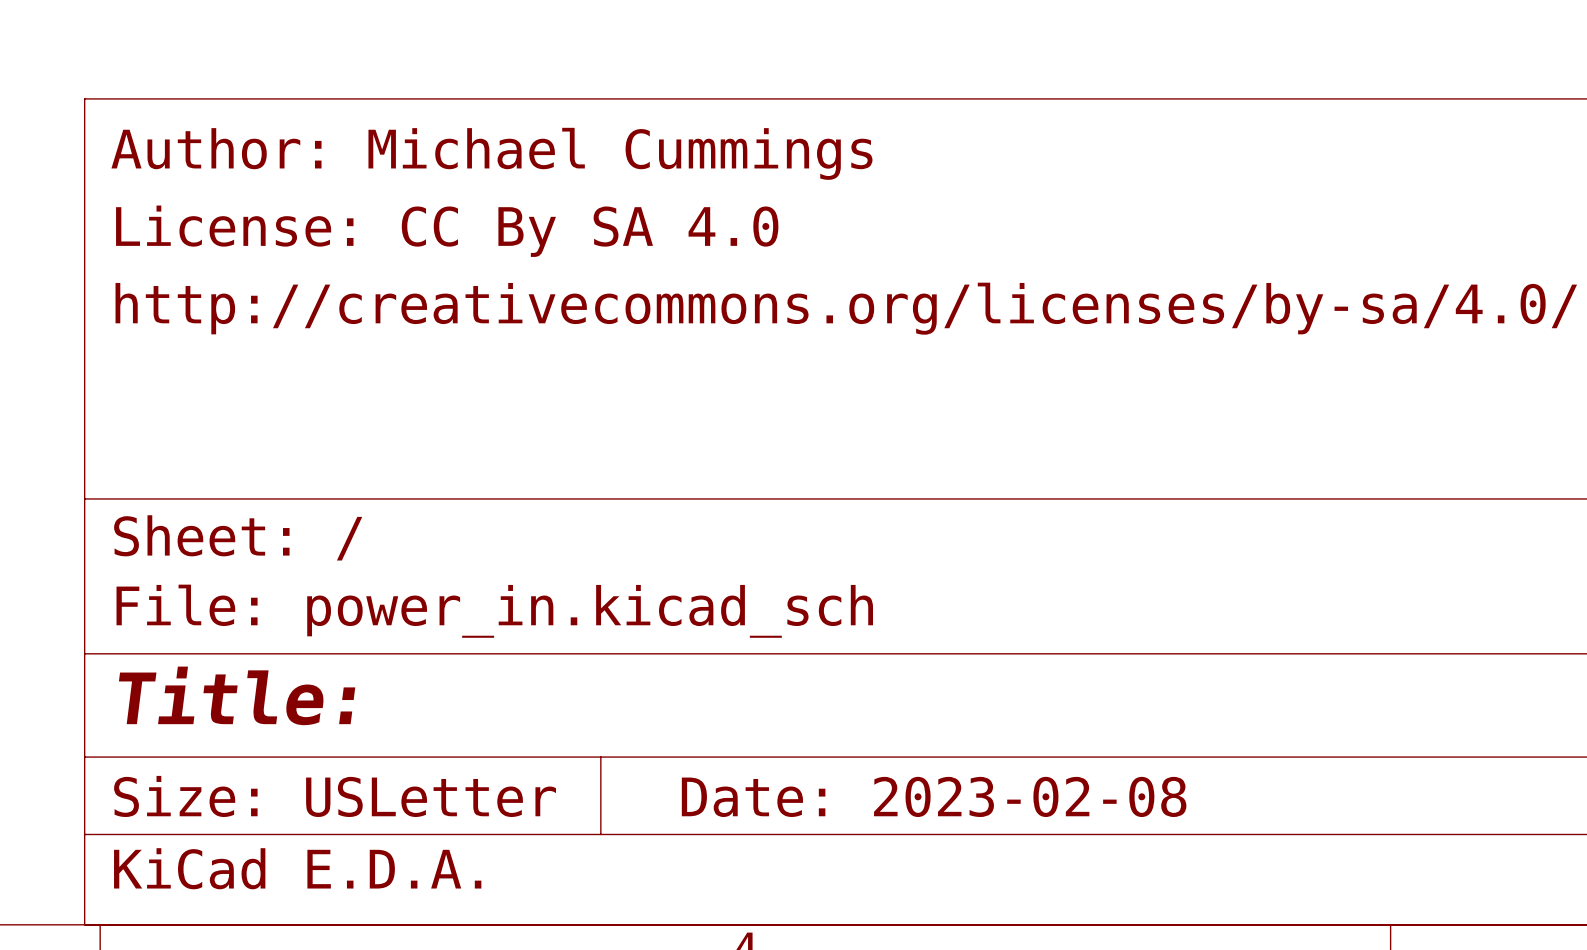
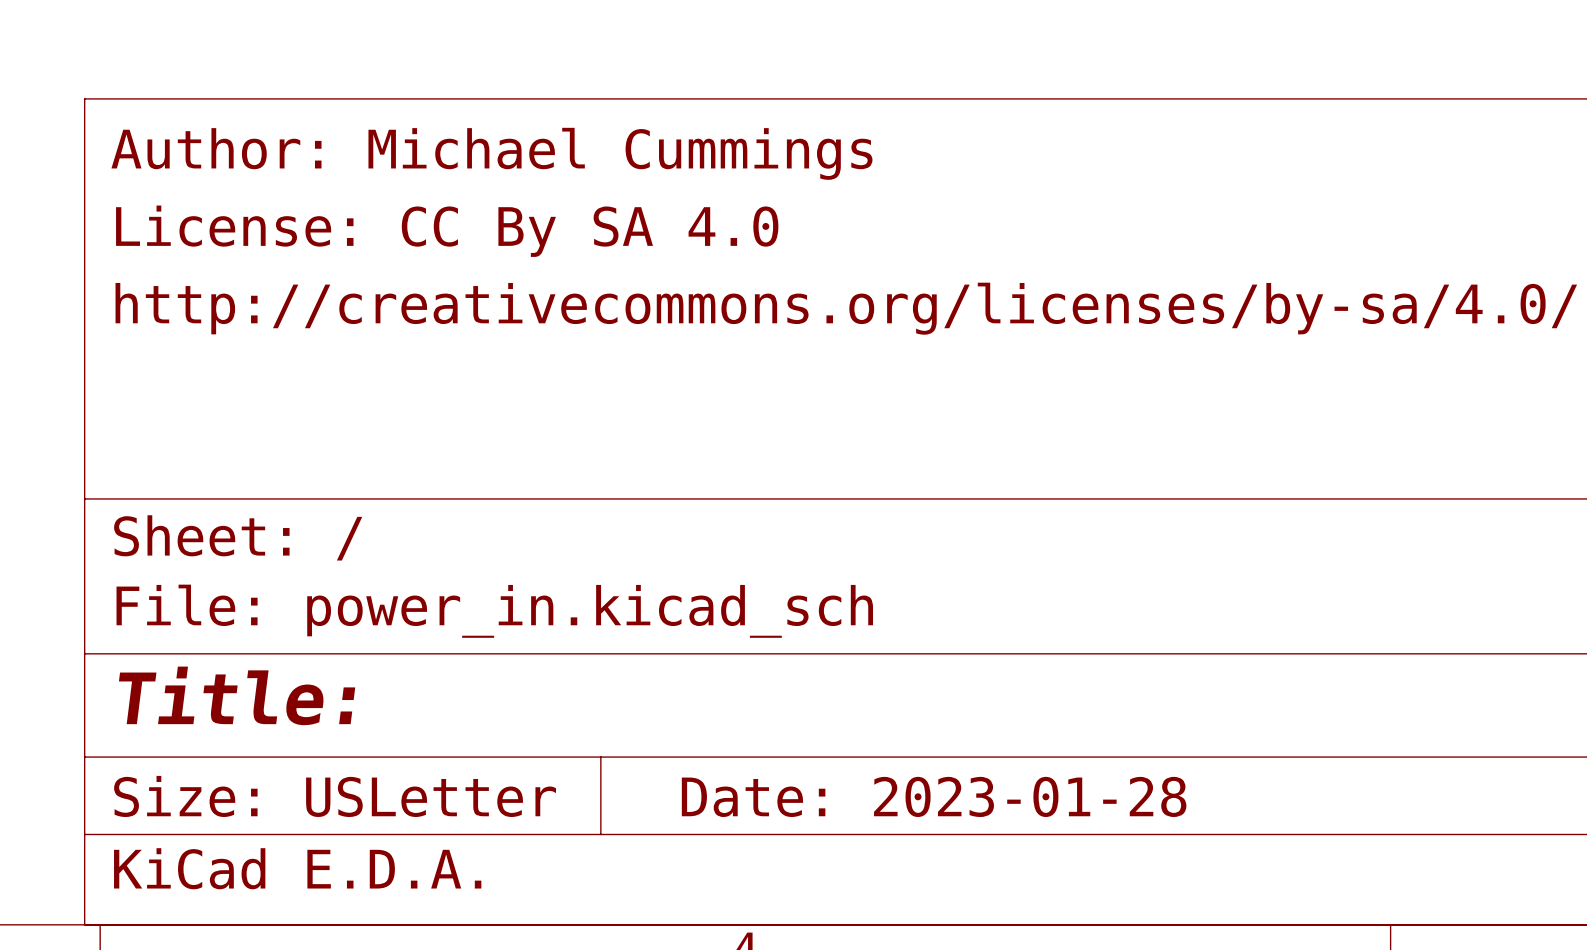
title block: Date: 2023-02-08 (934, 796) -> Date: 2023-01-28 (934, 796)

